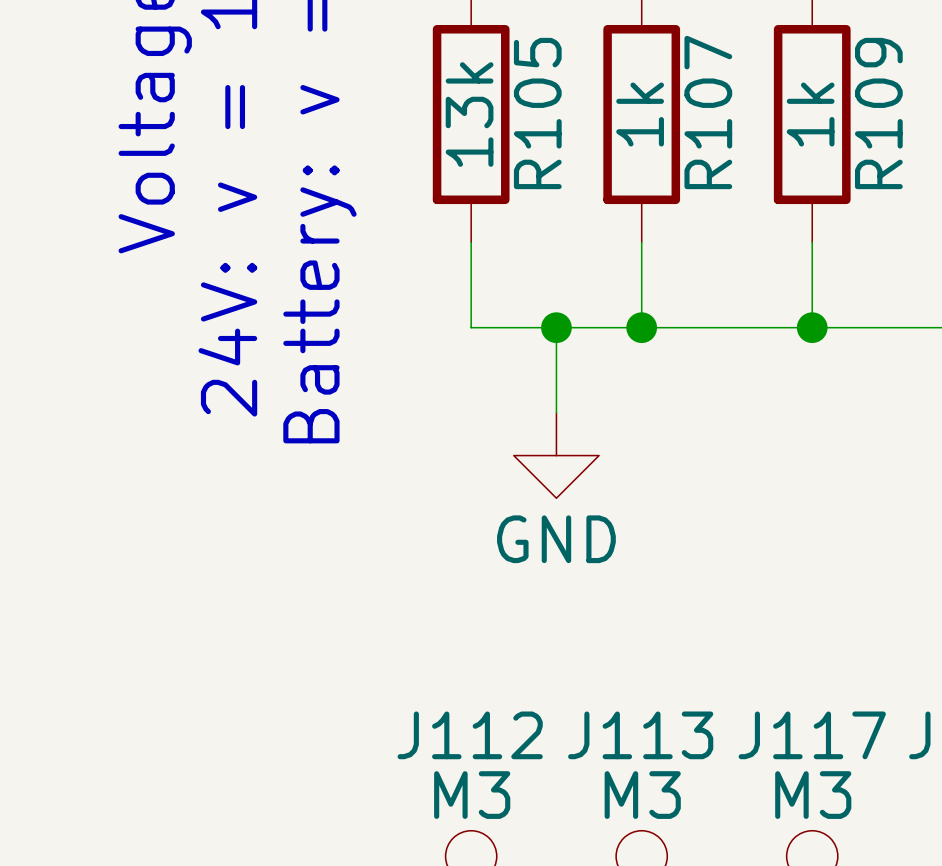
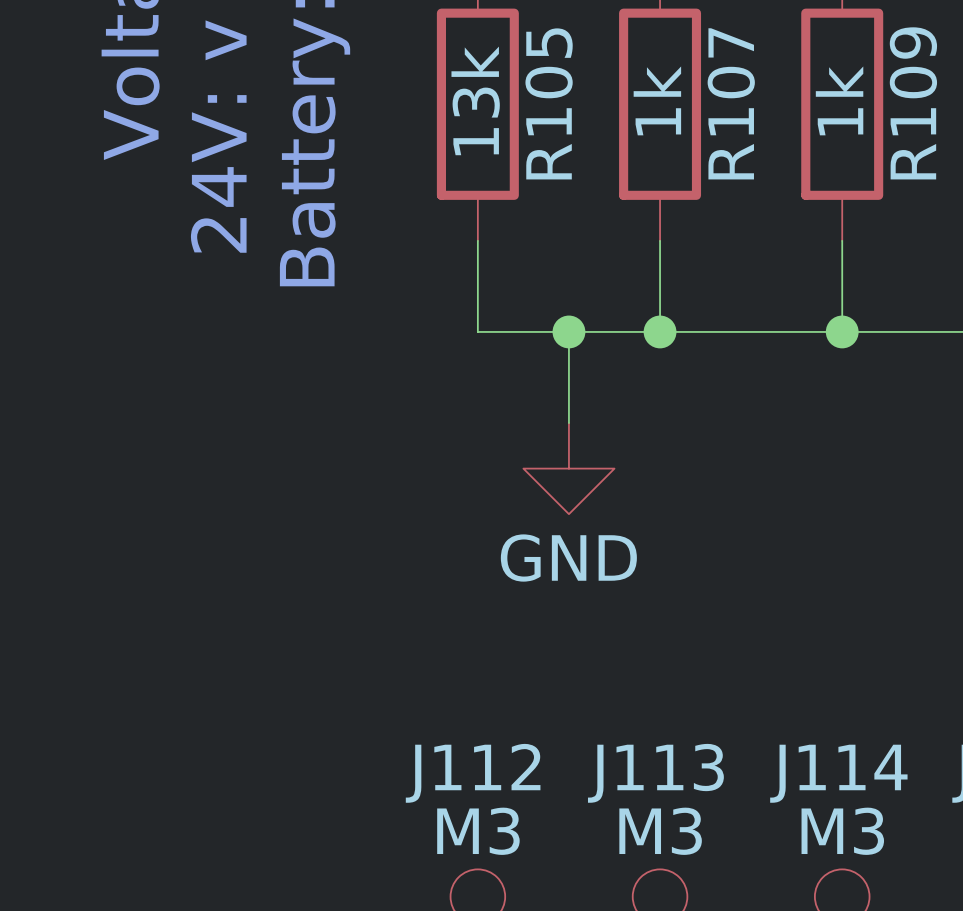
J117 name: J117 (812, 735) -> J114 (838, 773)

